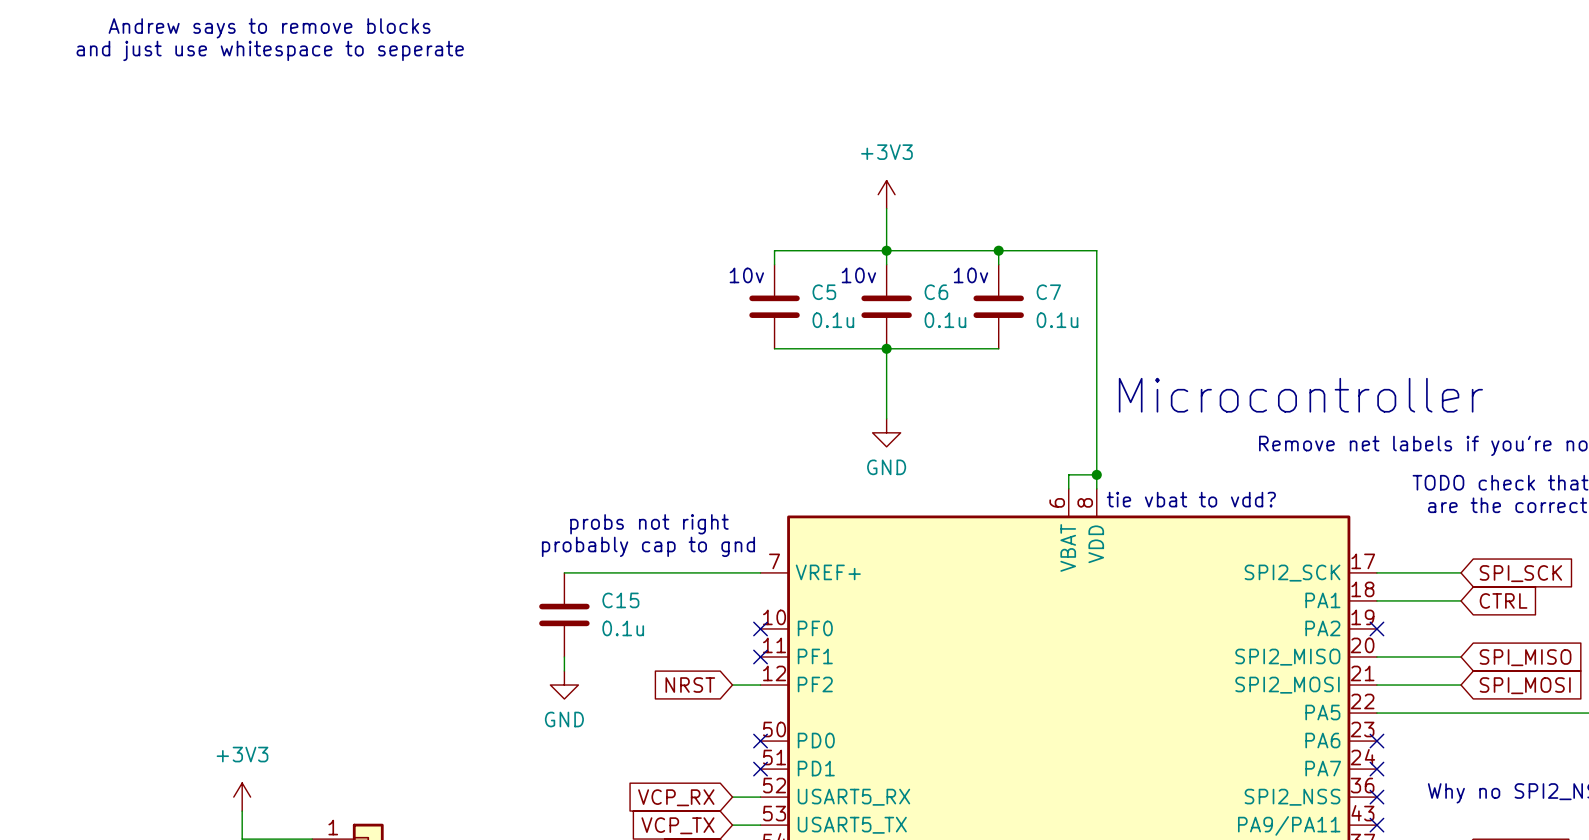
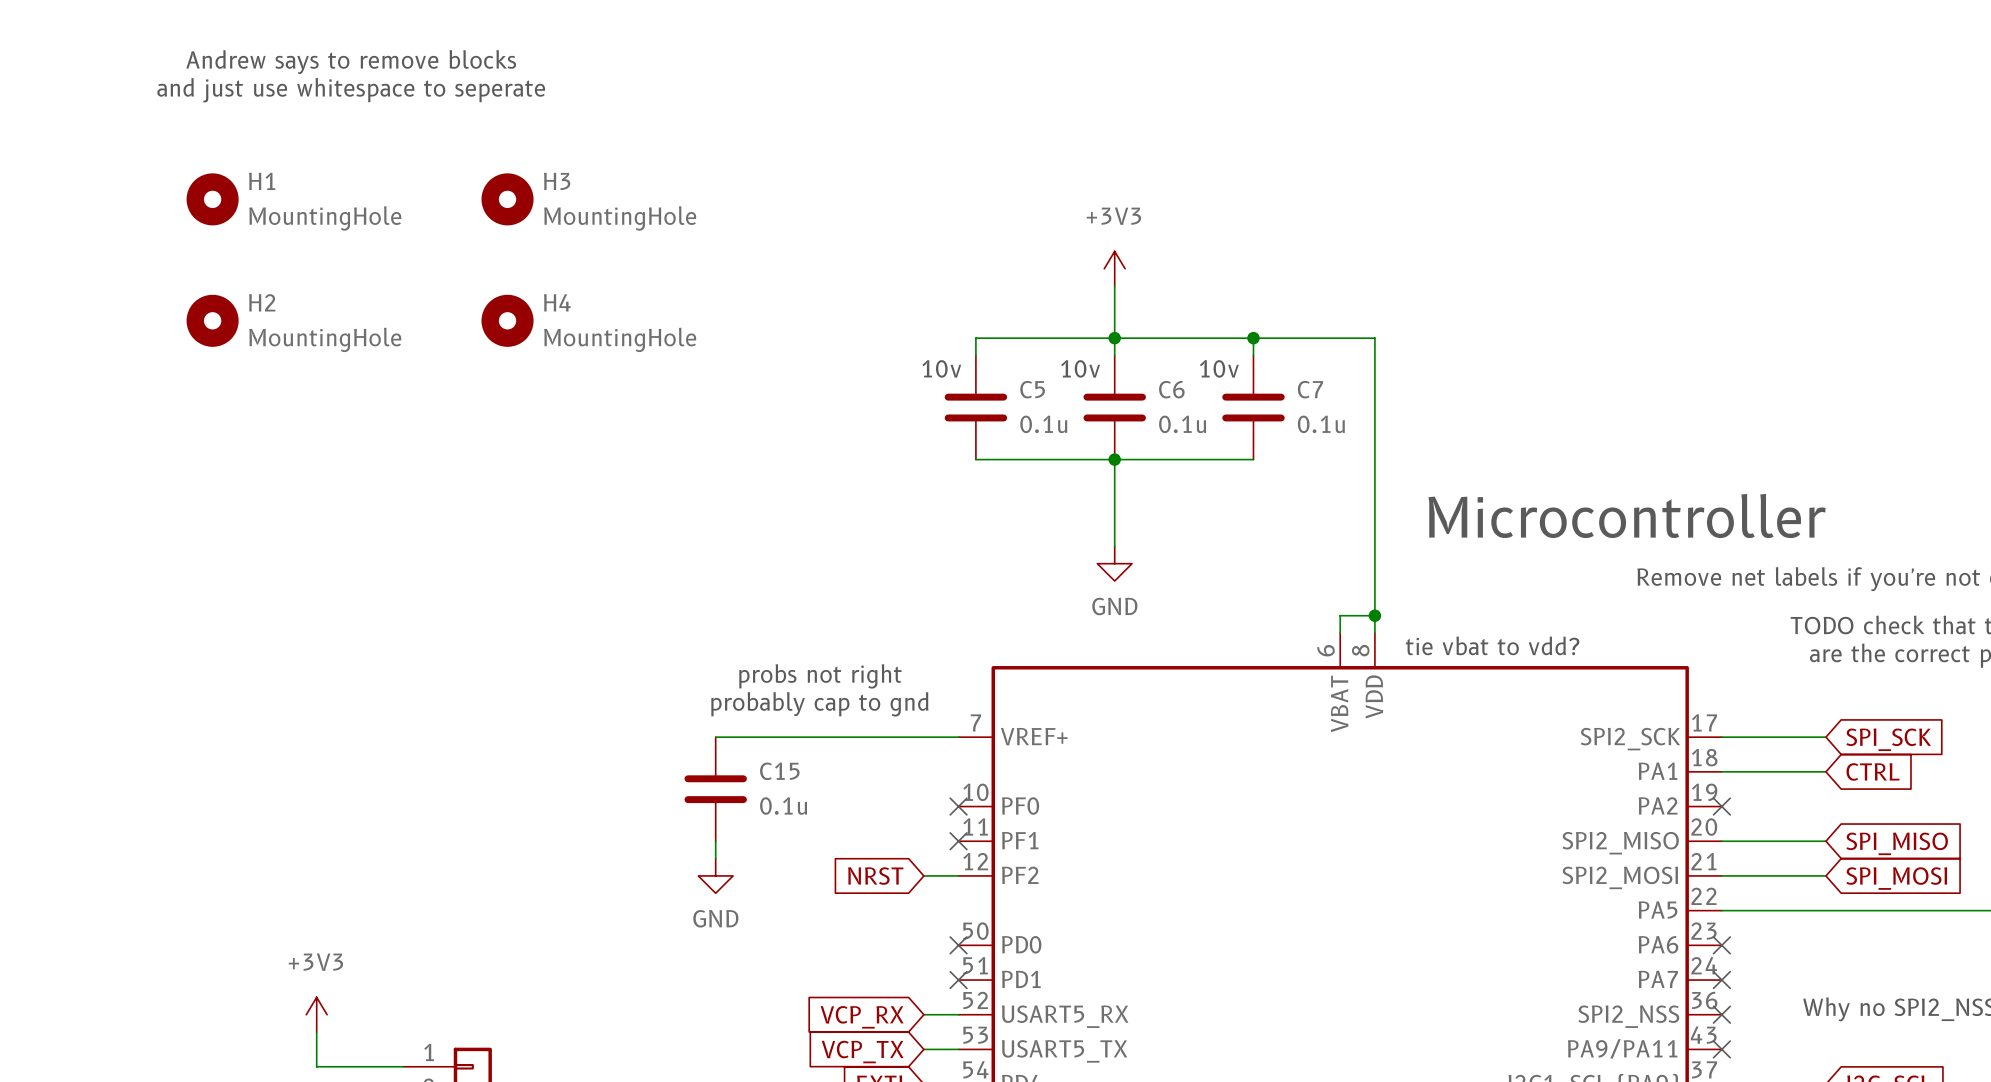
H1: none -> MountingHole (212, 199)
H3: none -> MountingHole (507, 199)
H2: none -> MountingHole (212, 320)
H4: none -> MountingHole (507, 320)

